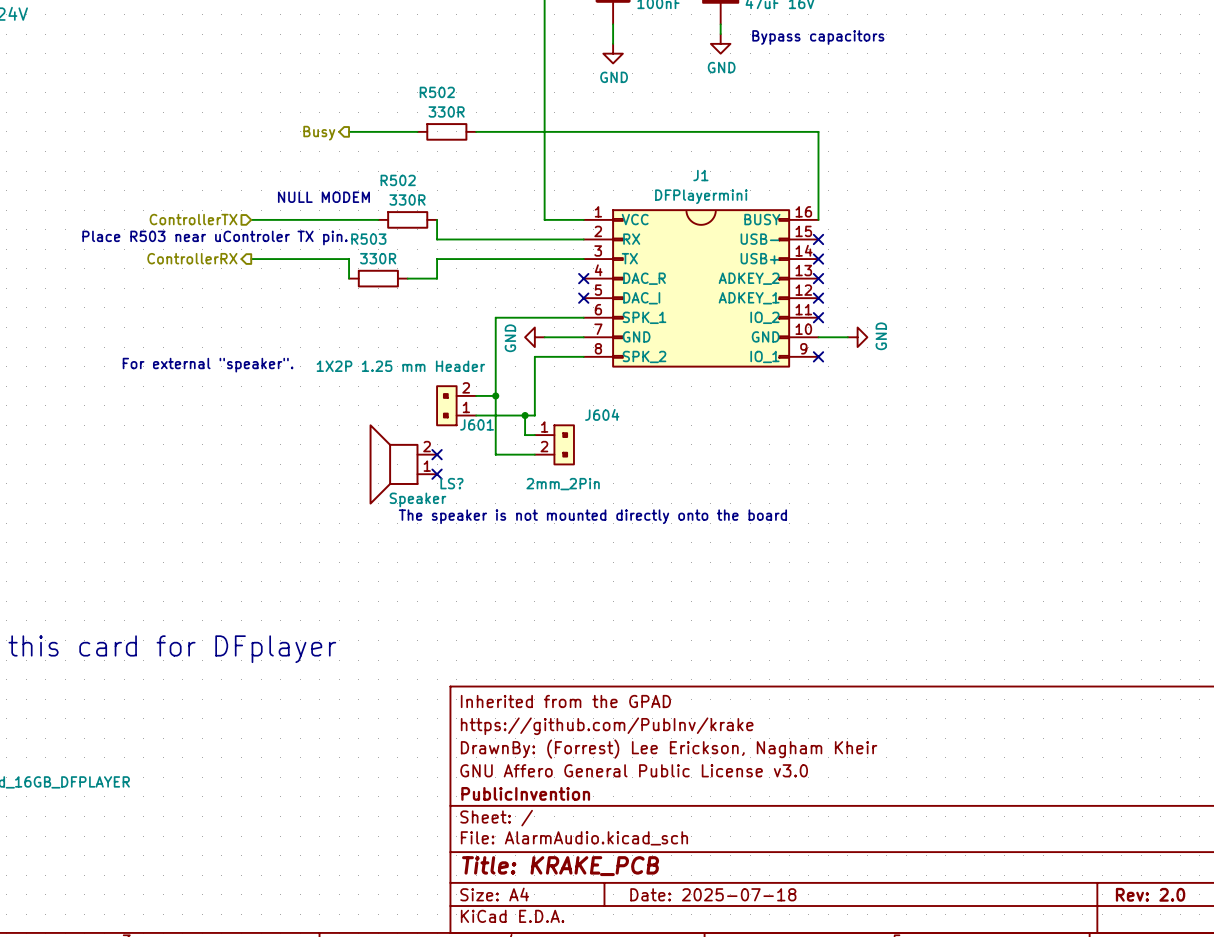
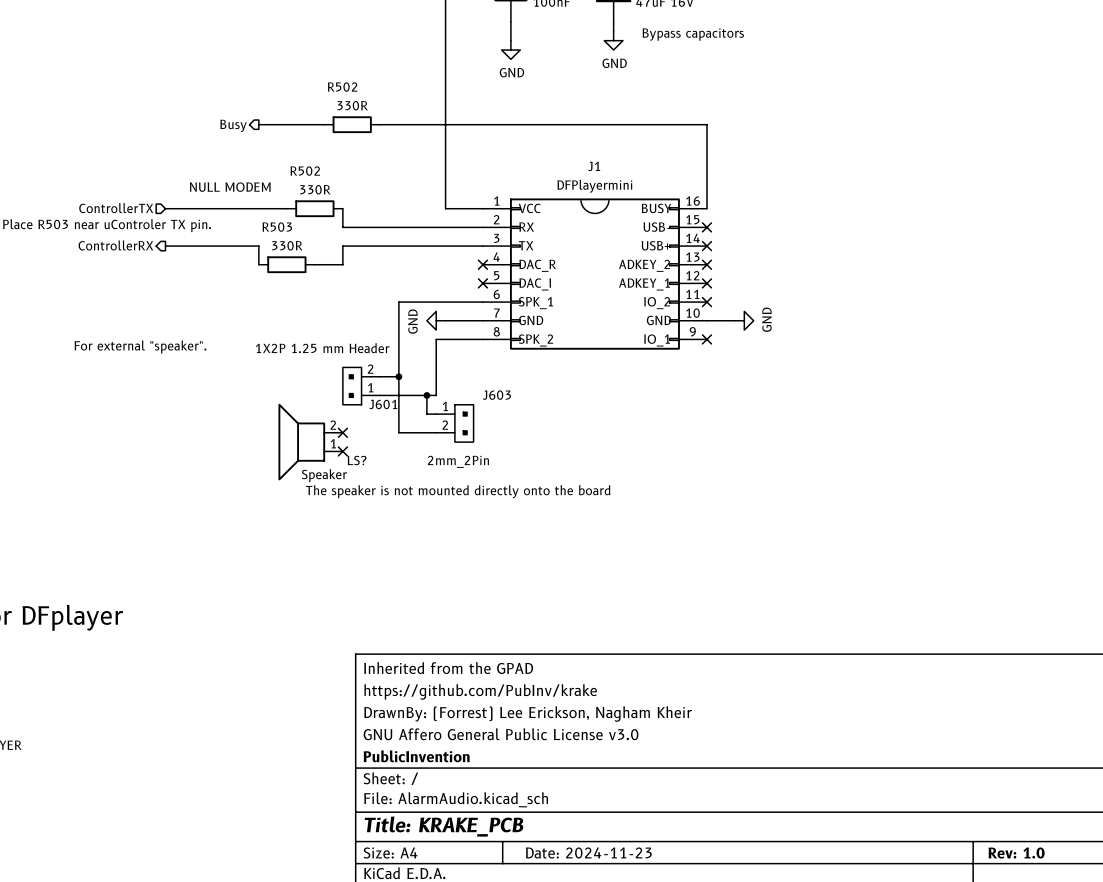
J604 name: J604 (602, 414) -> J603 (496, 395)
title block: Date: 2025-07-18 (713, 894) -> Date: 2024-11-23 (588, 852)
title block: Rev: 2.0 (1150, 894) -> Rev: 1.0 (1016, 853)

